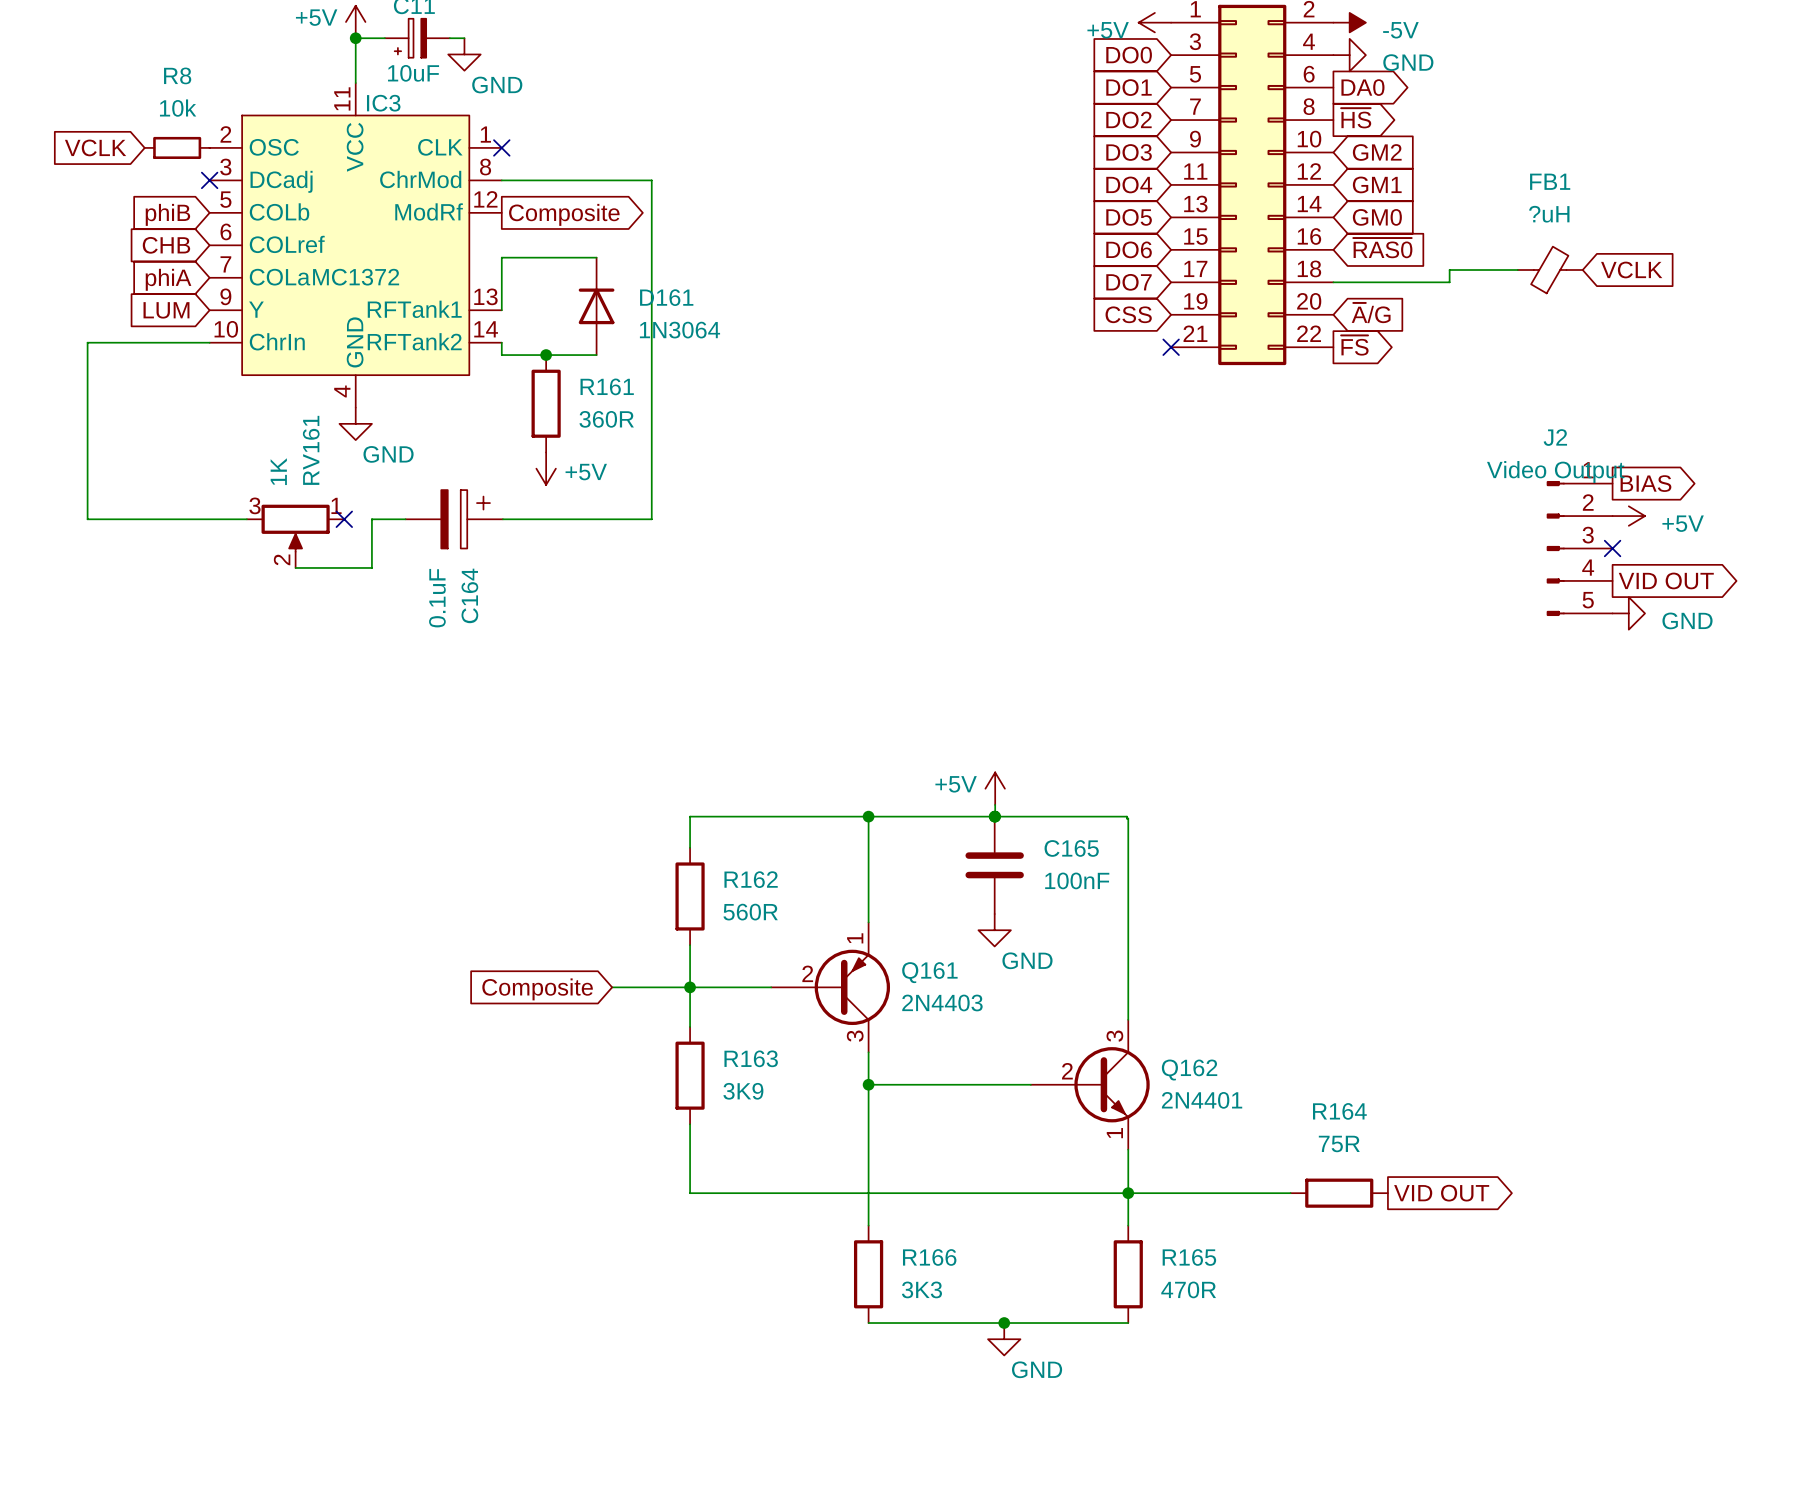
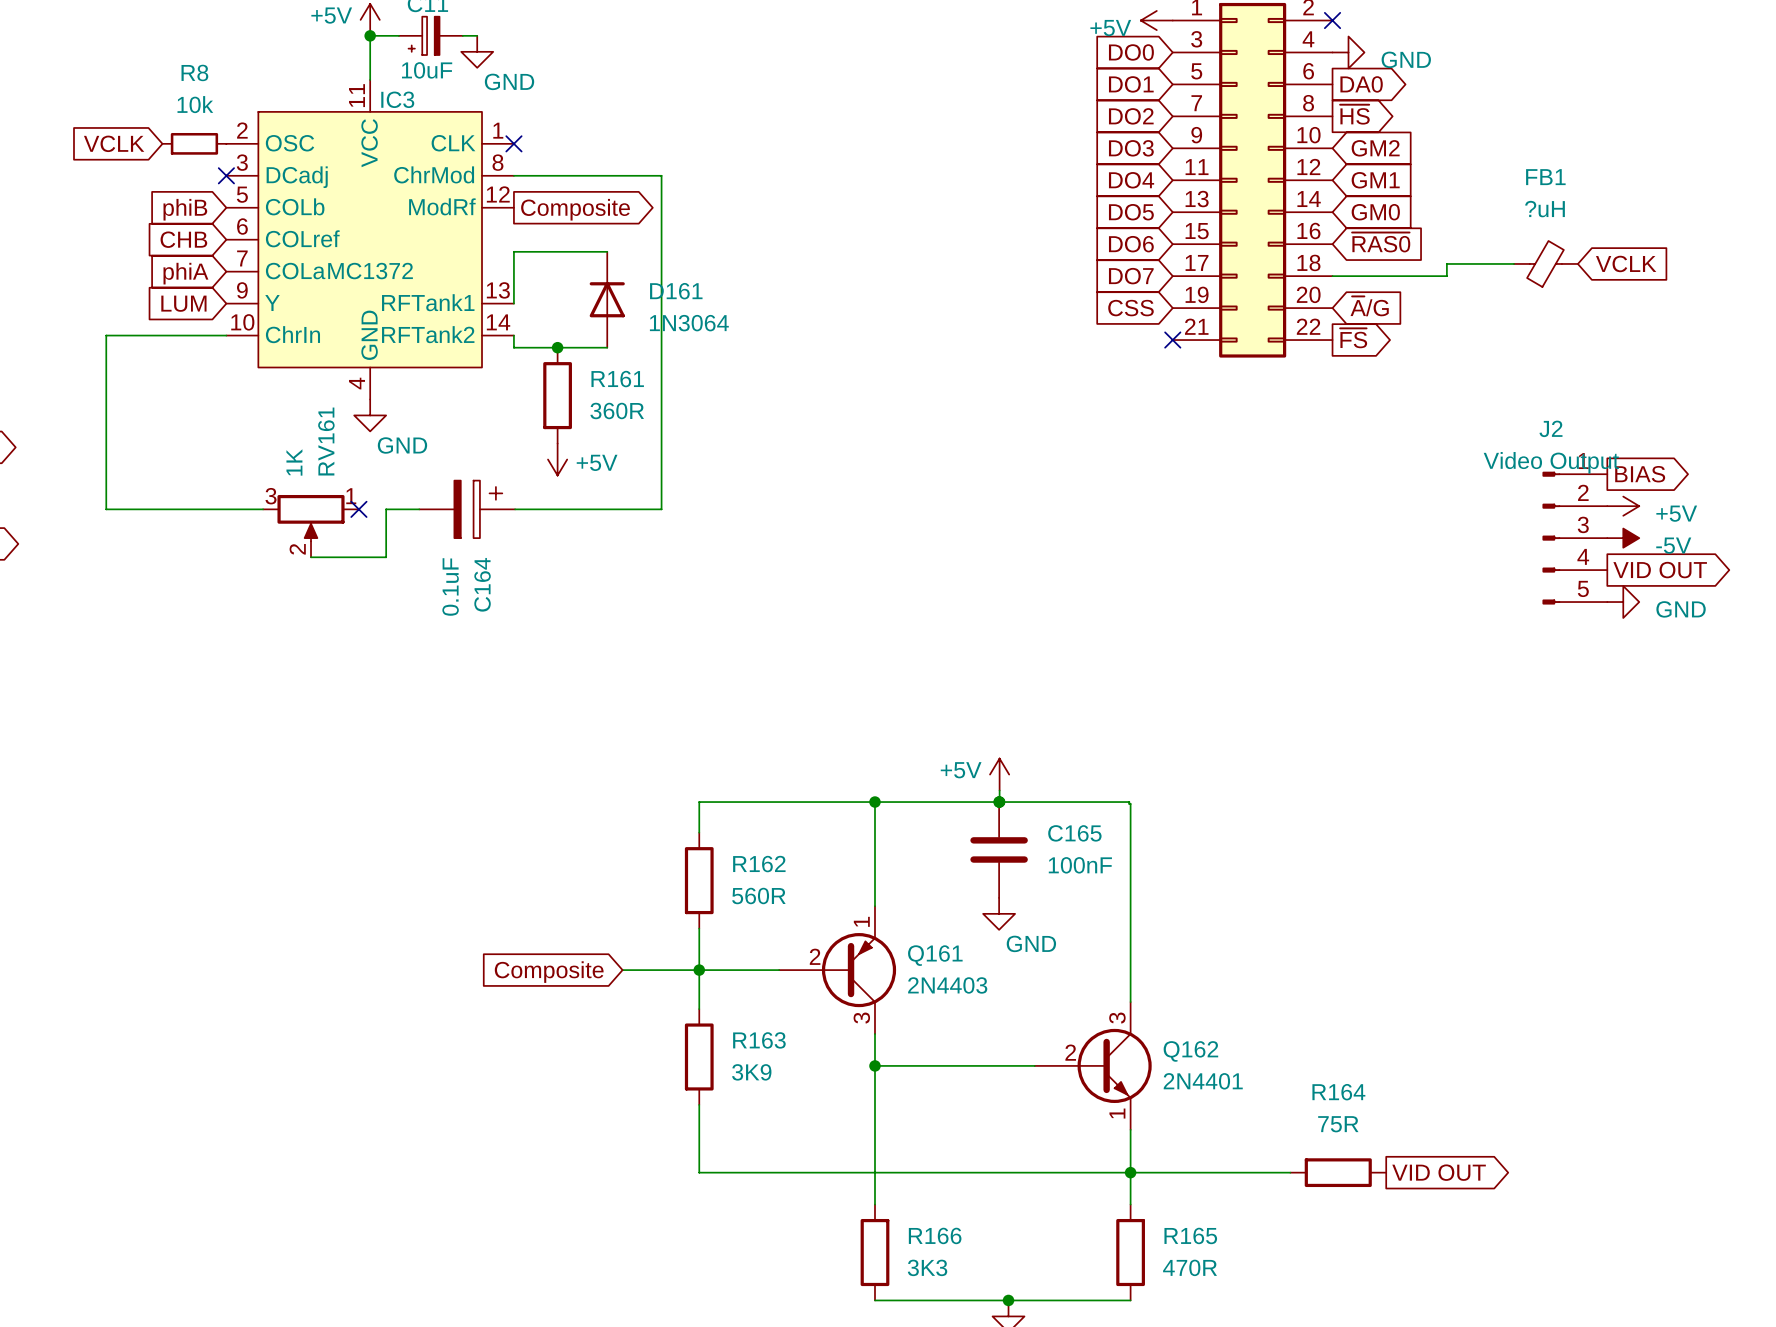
no-connect mark: none -> (1332, 20)
power symbol: -5V (1349, 22) -> none
no-connect mark: (1612, 548) -> none
power symbol: none -> -5V (1623, 538)

